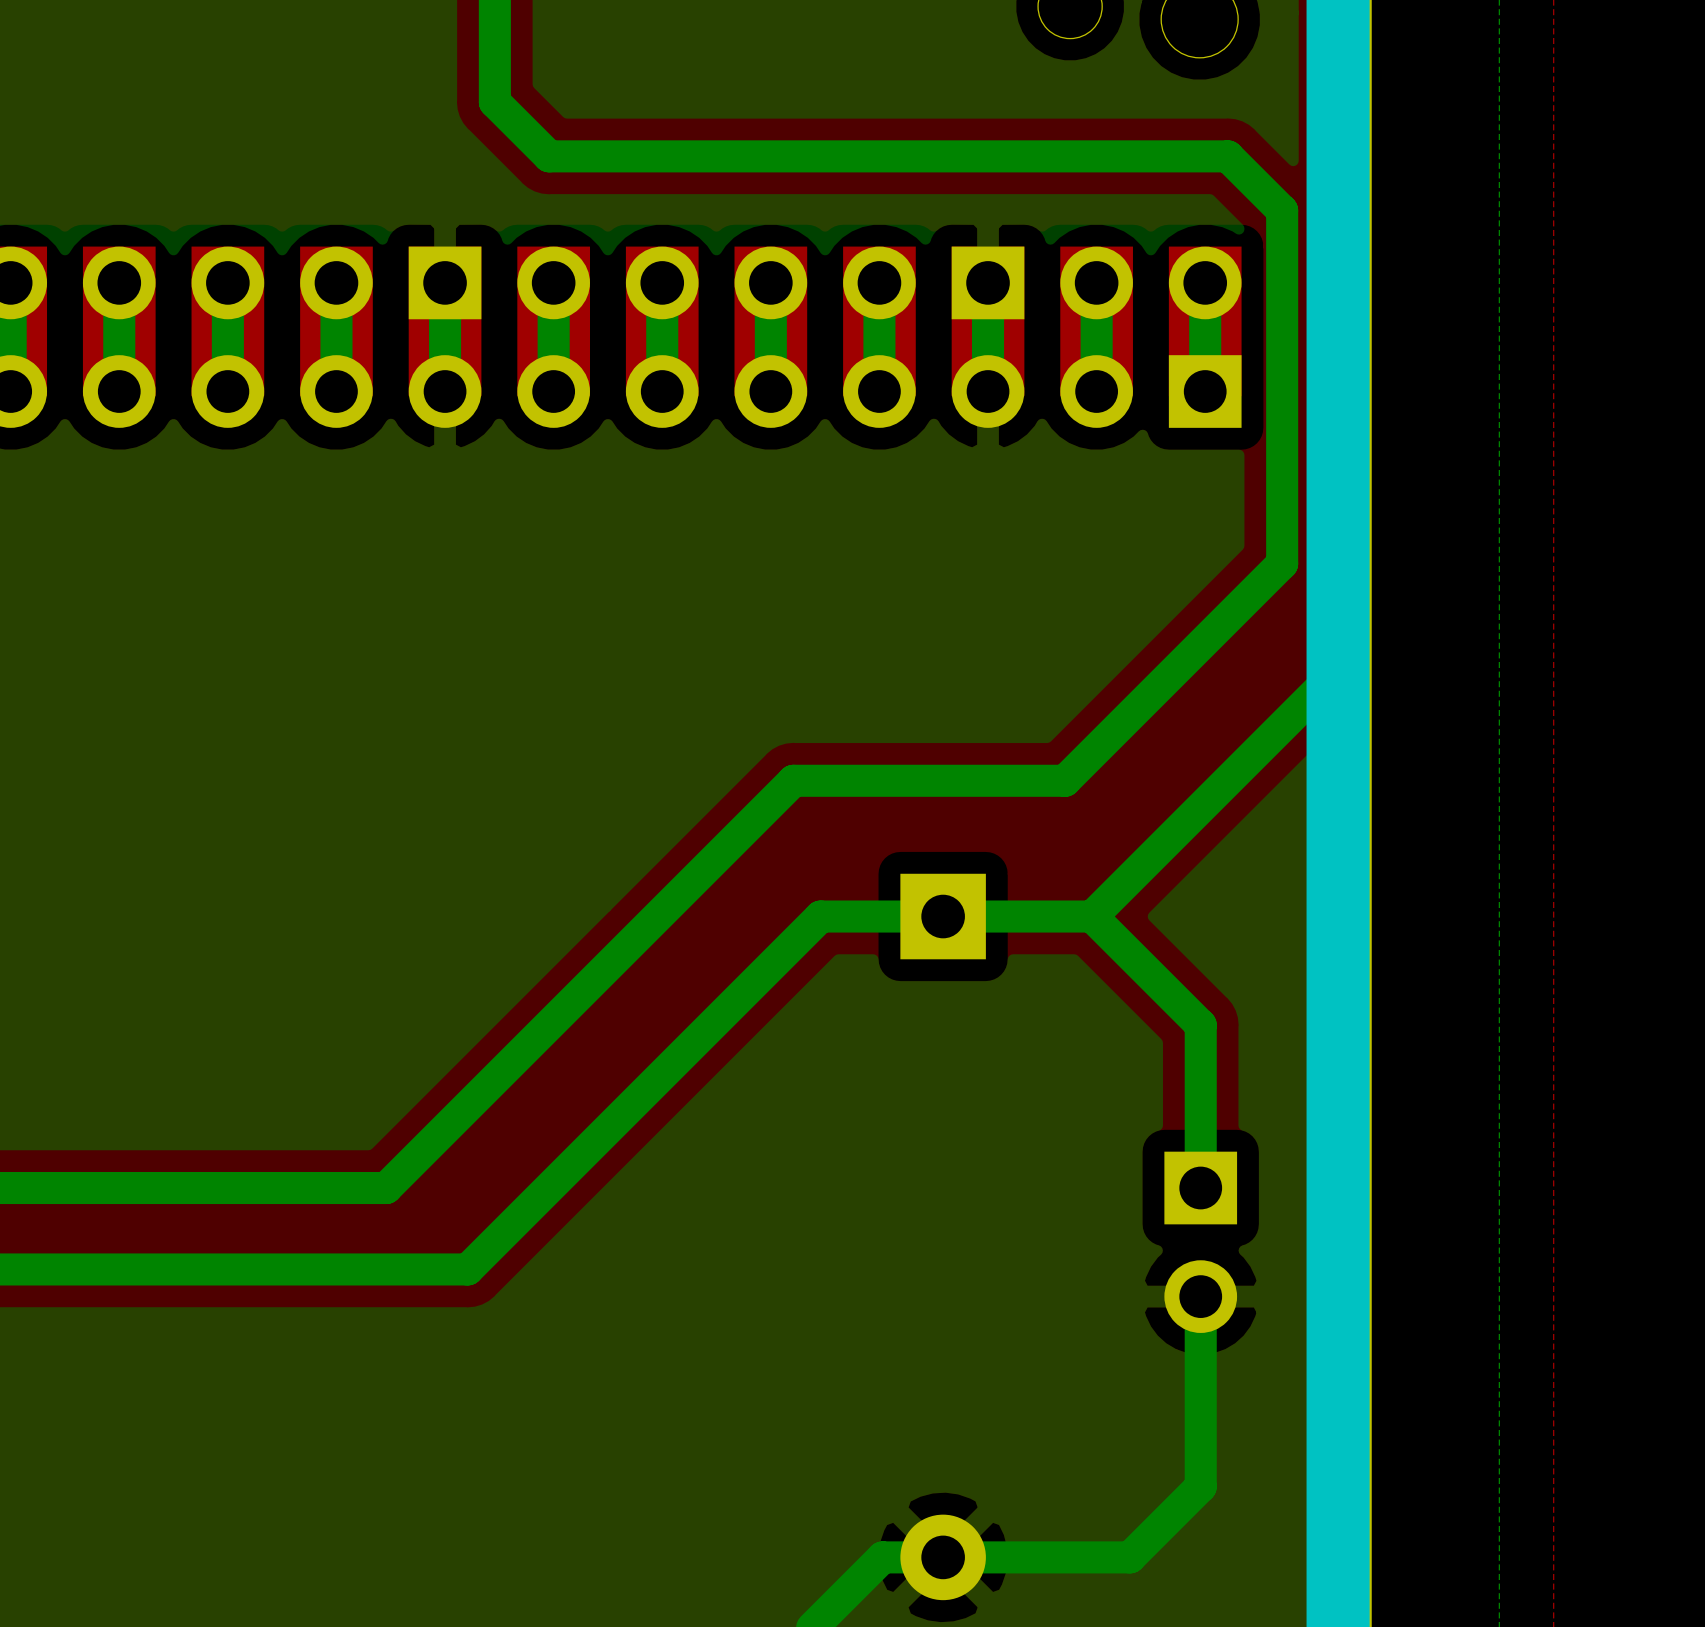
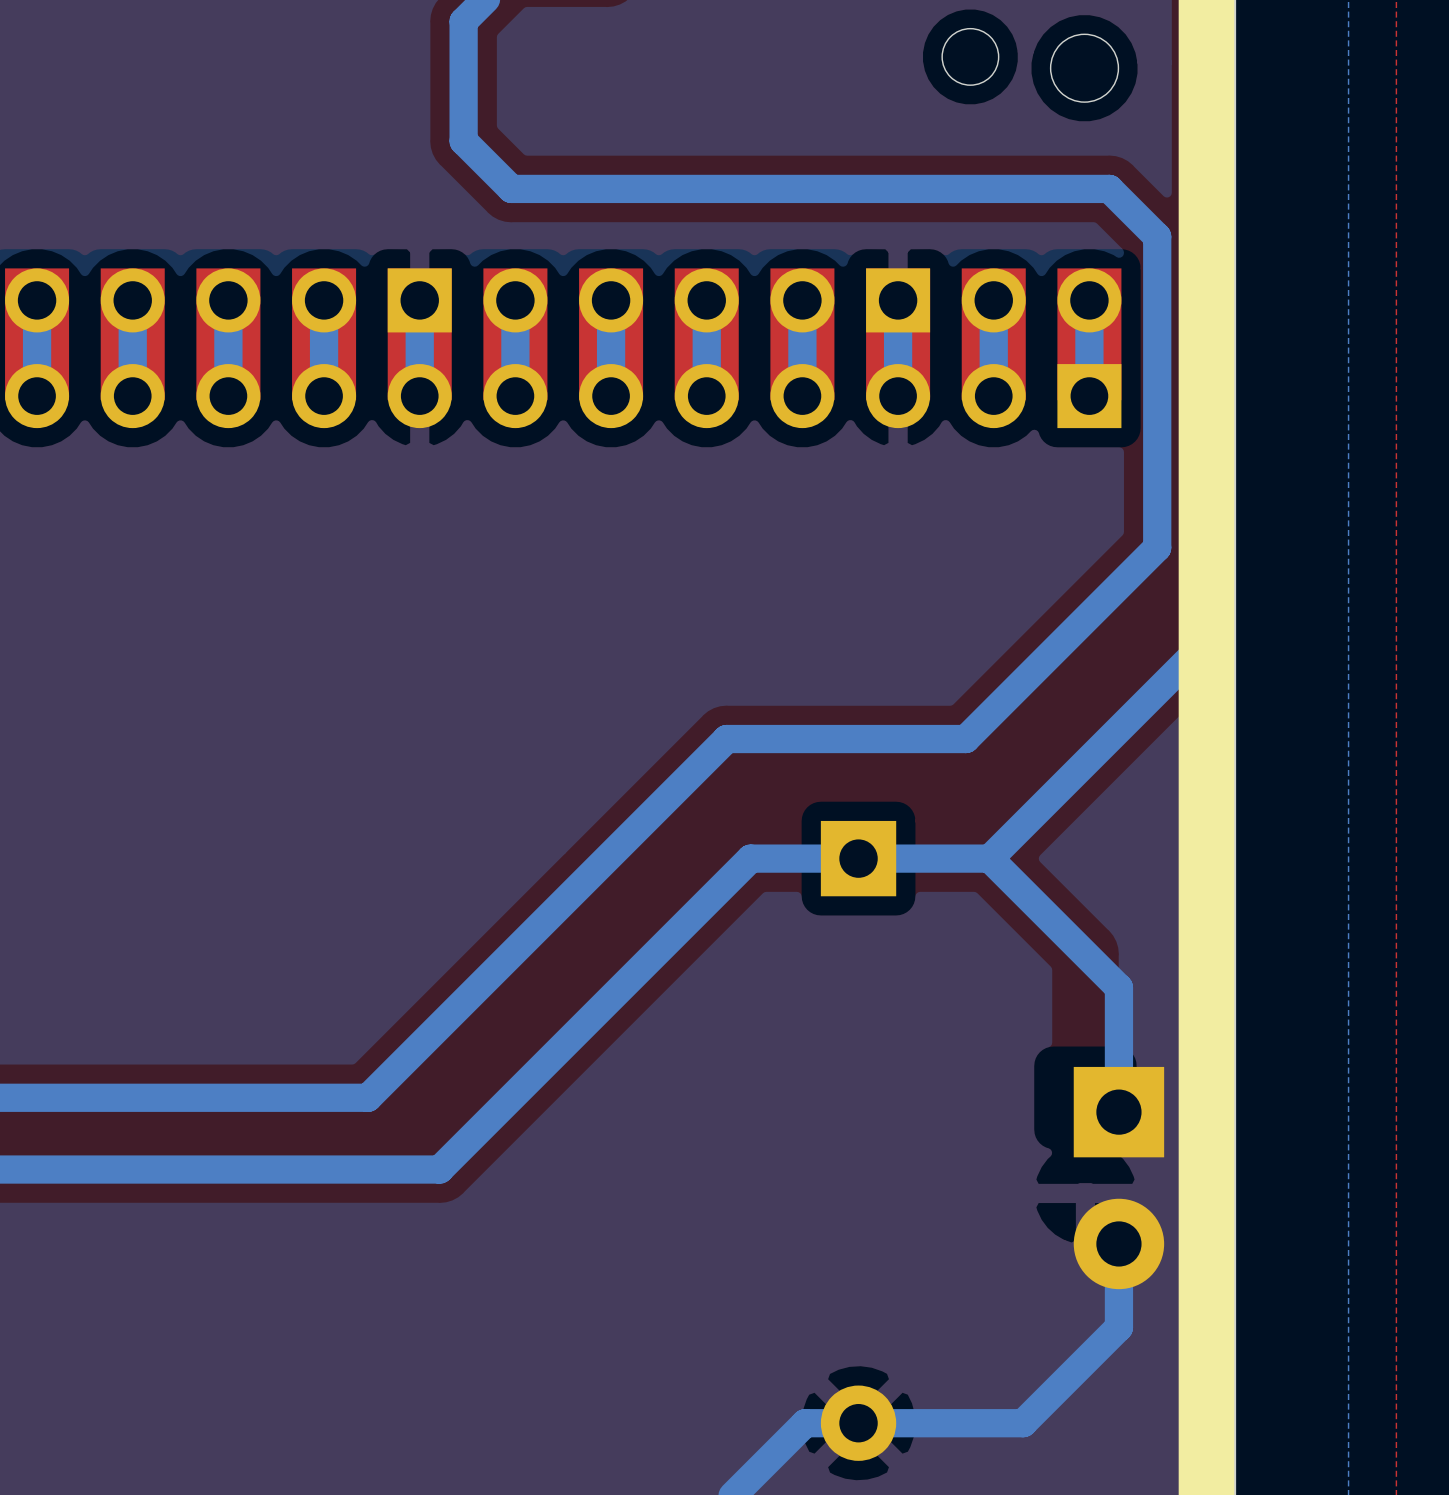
bottom track: (1200, 1025) (1200, 1188) -> (1085, 954) (1118, 987) (1118, 1112)
part: (1200, 1242) -> none
part: none -> (1118, 1178)
bottom track: (1200, 1296) (1200, 1486) -> (1118, 1243) (1118, 1327) (1085, 1360)

